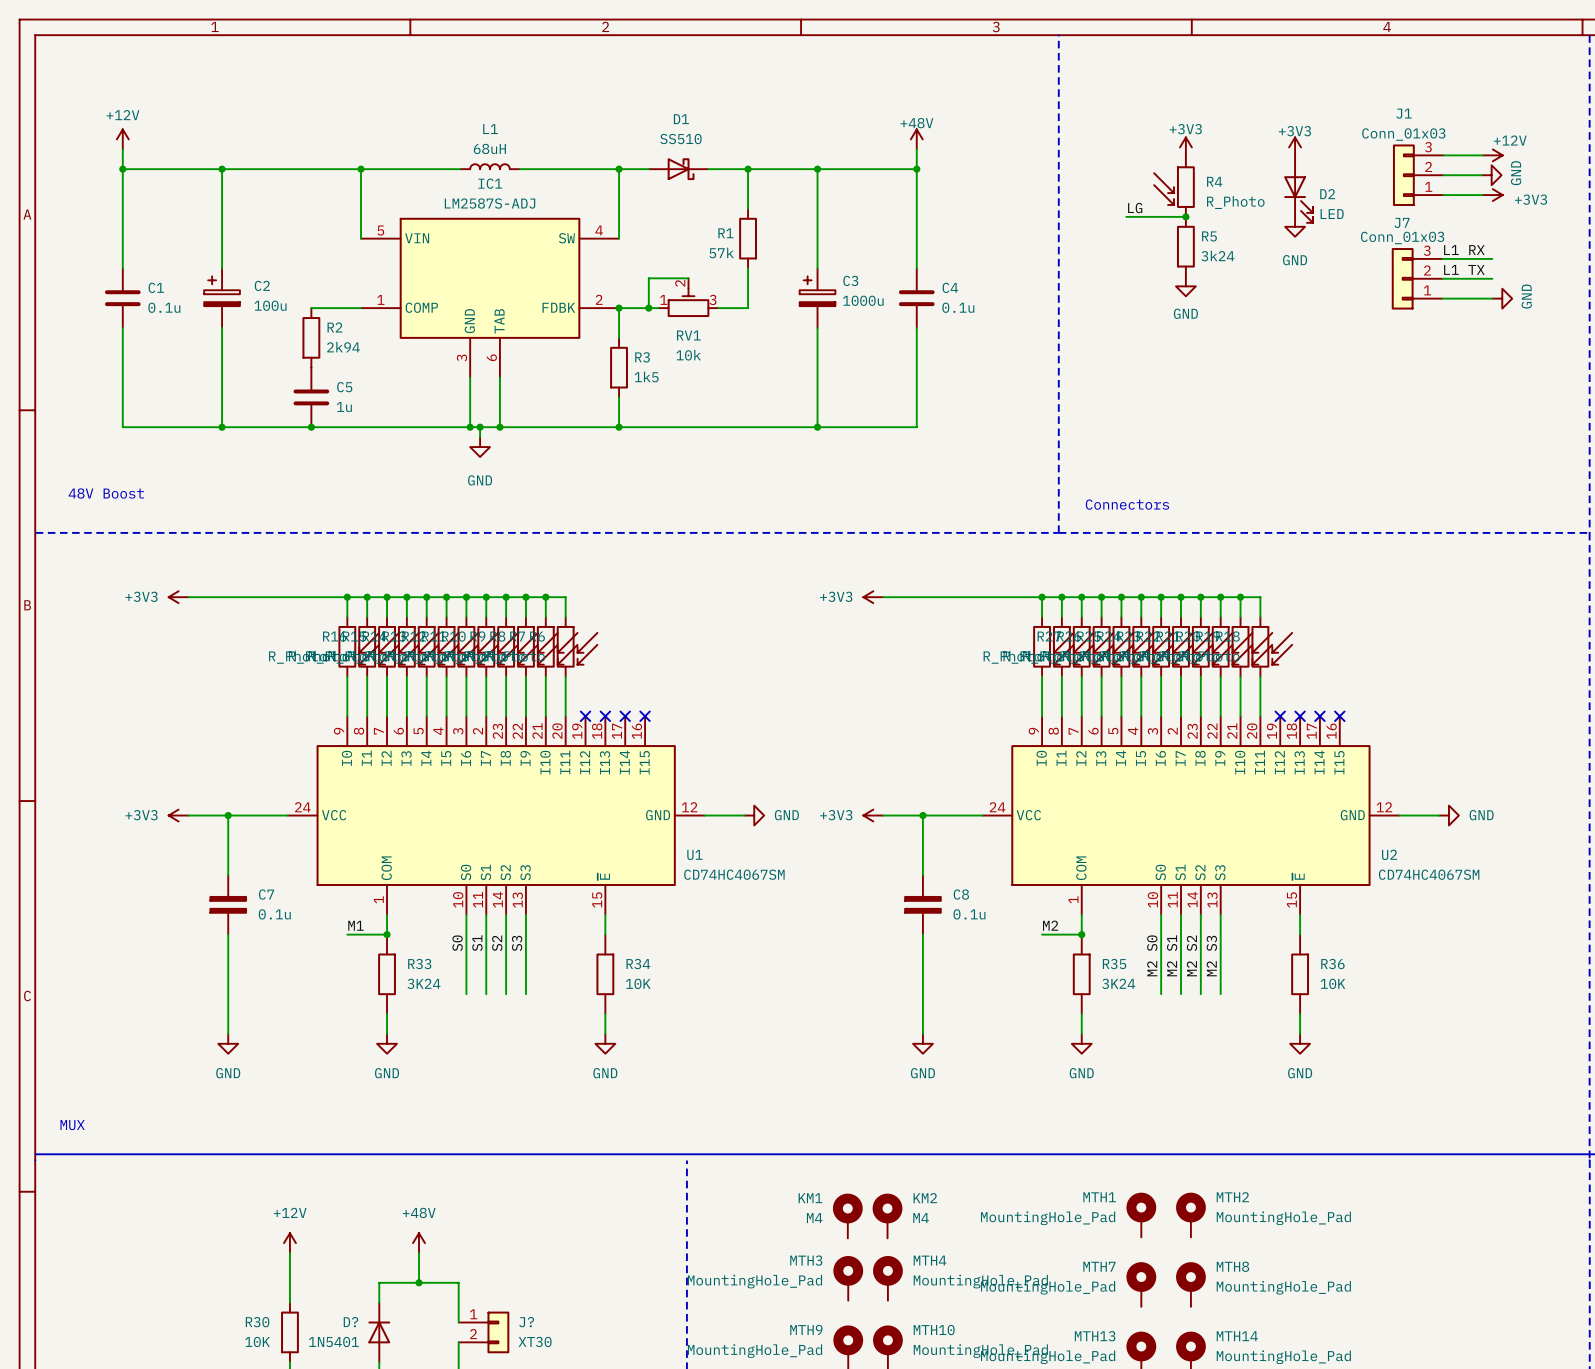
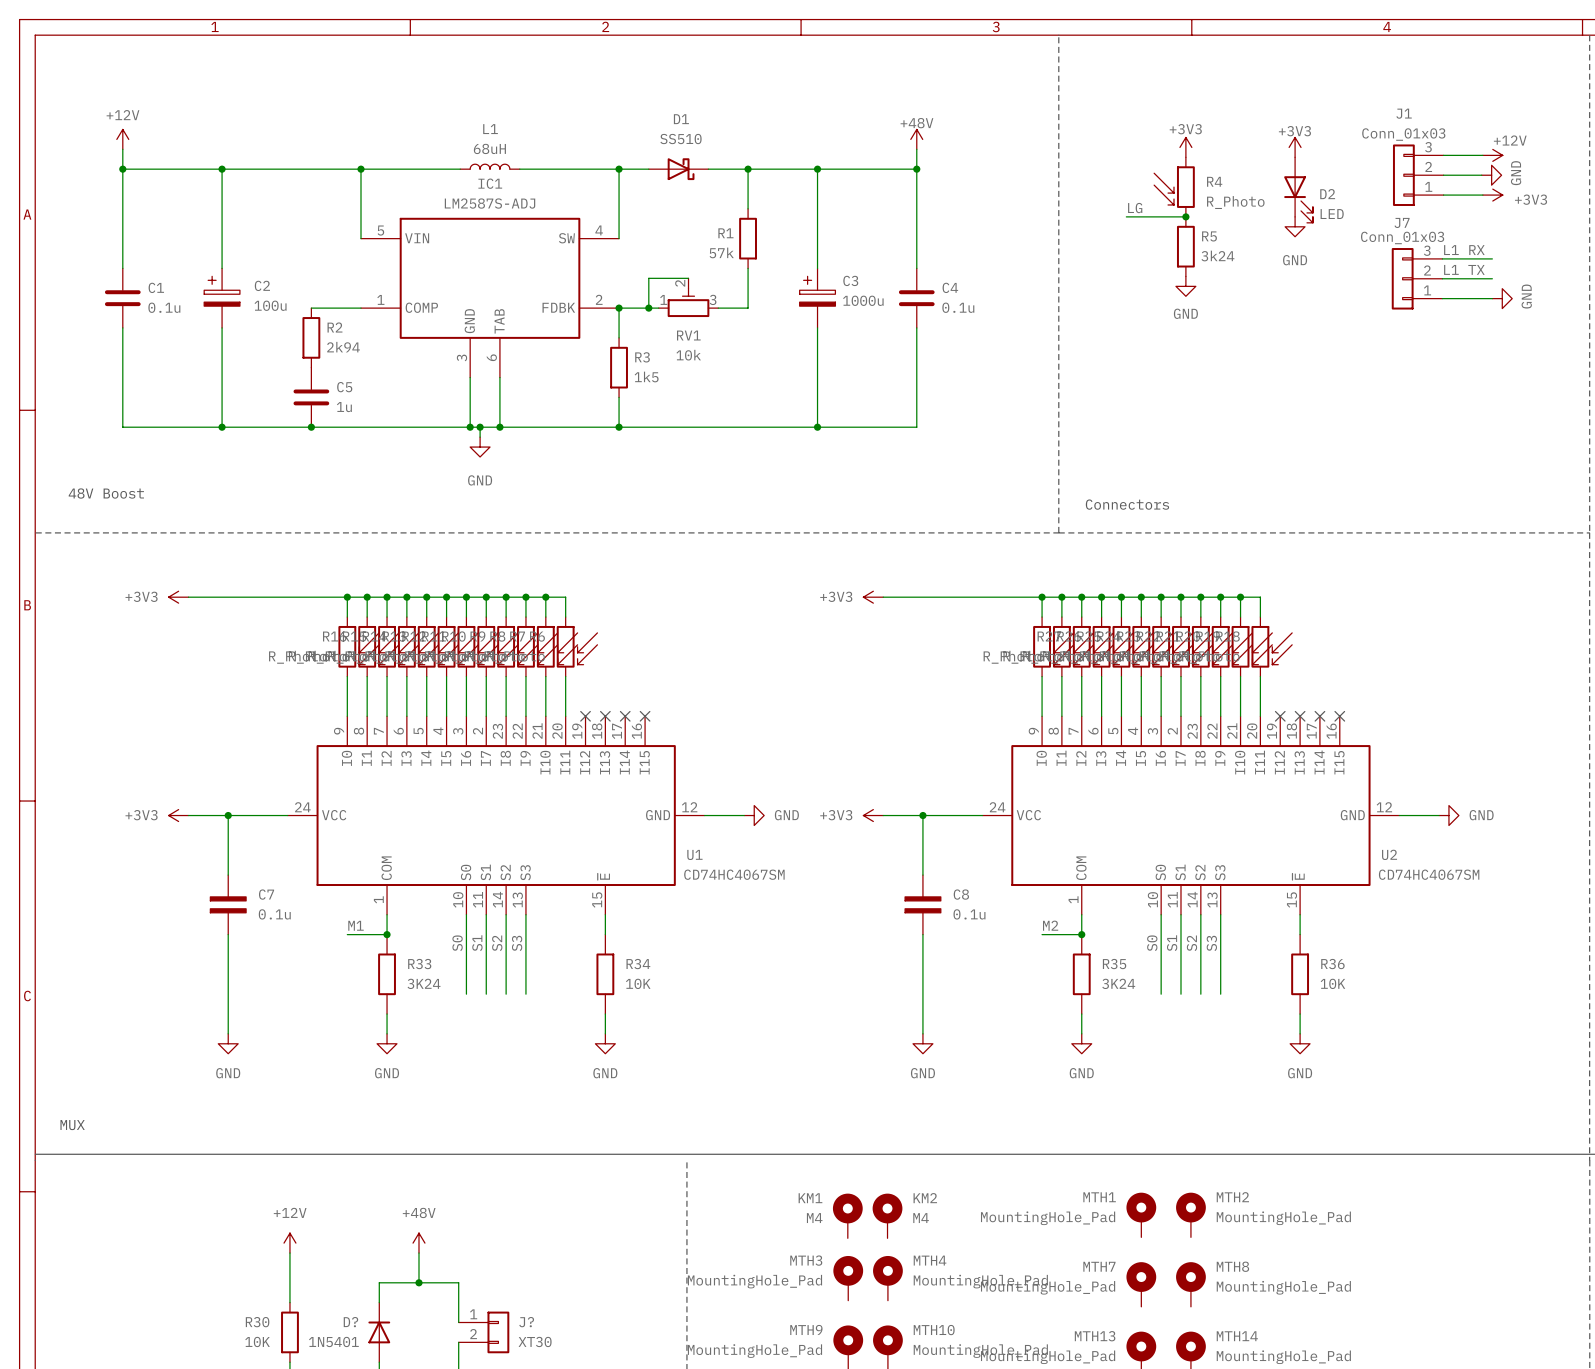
label: M2 S0 (1152, 955) -> S0 (1152, 943)
label: M2 S1 (1172, 955) -> S1 (1172, 943)
label: M2 S2 (1191, 955) -> S2 (1191, 943)
label: M2 S3 (1211, 956) -> S3 (1211, 943)

